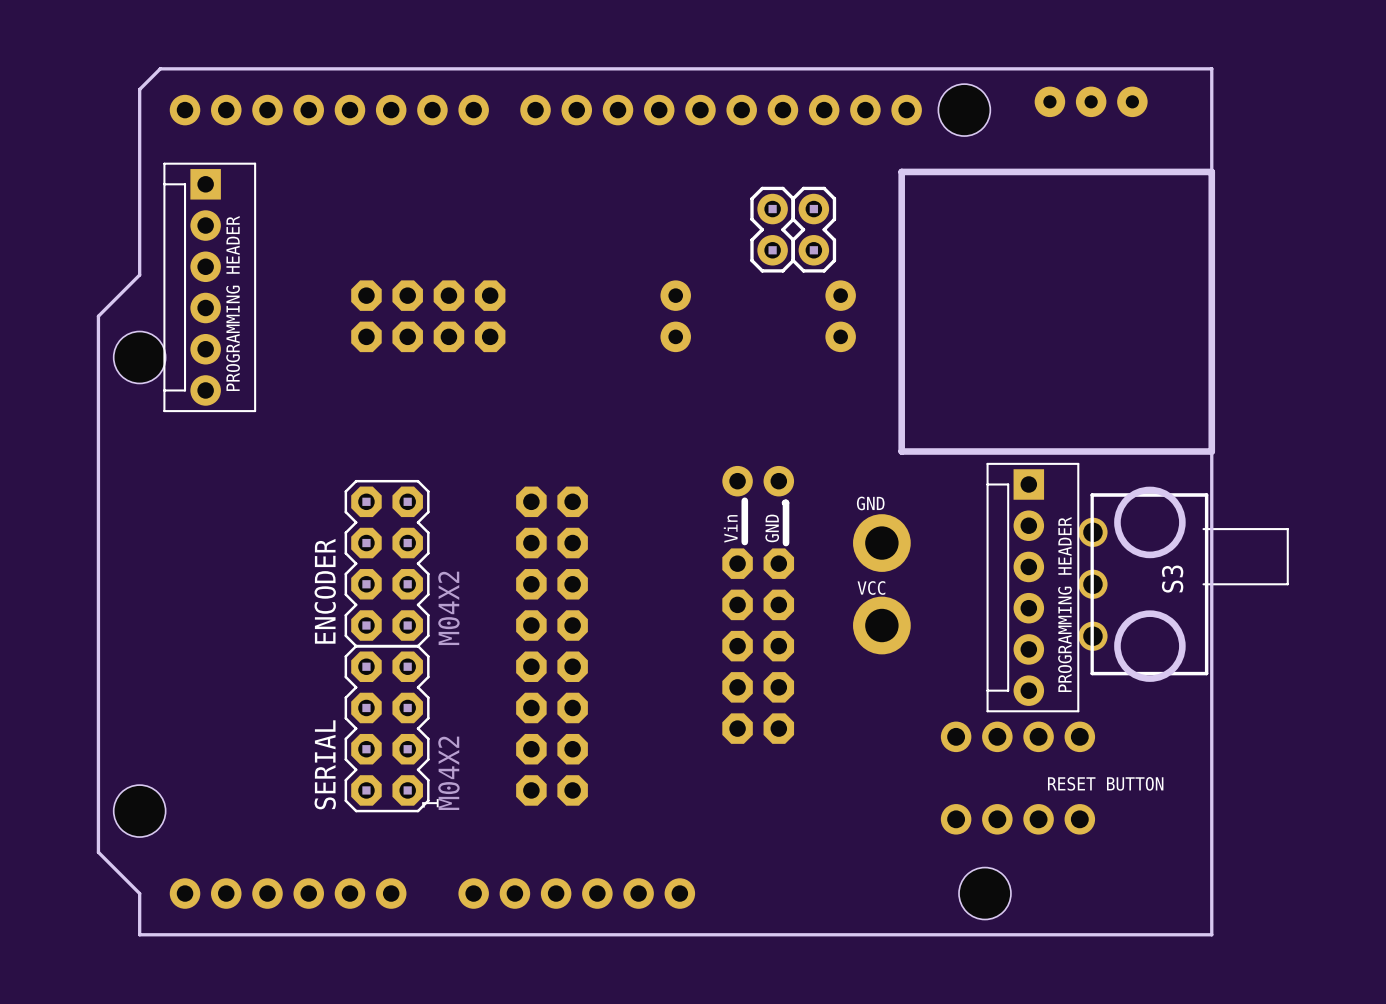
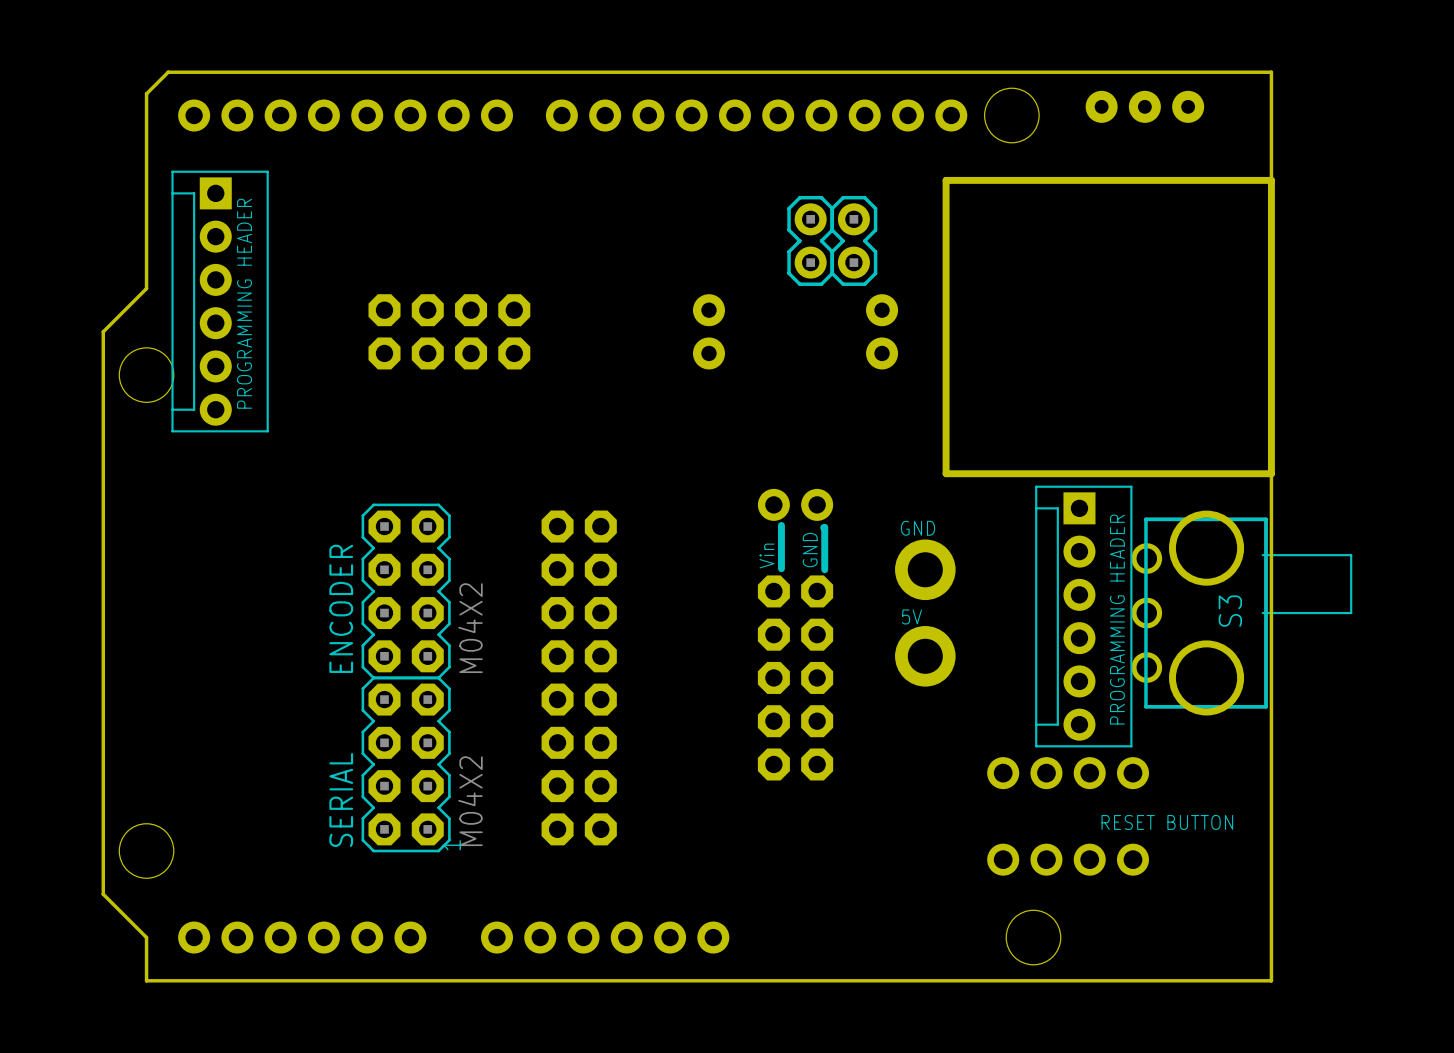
text: VCC (871, 588) -> 5V (911, 616)

